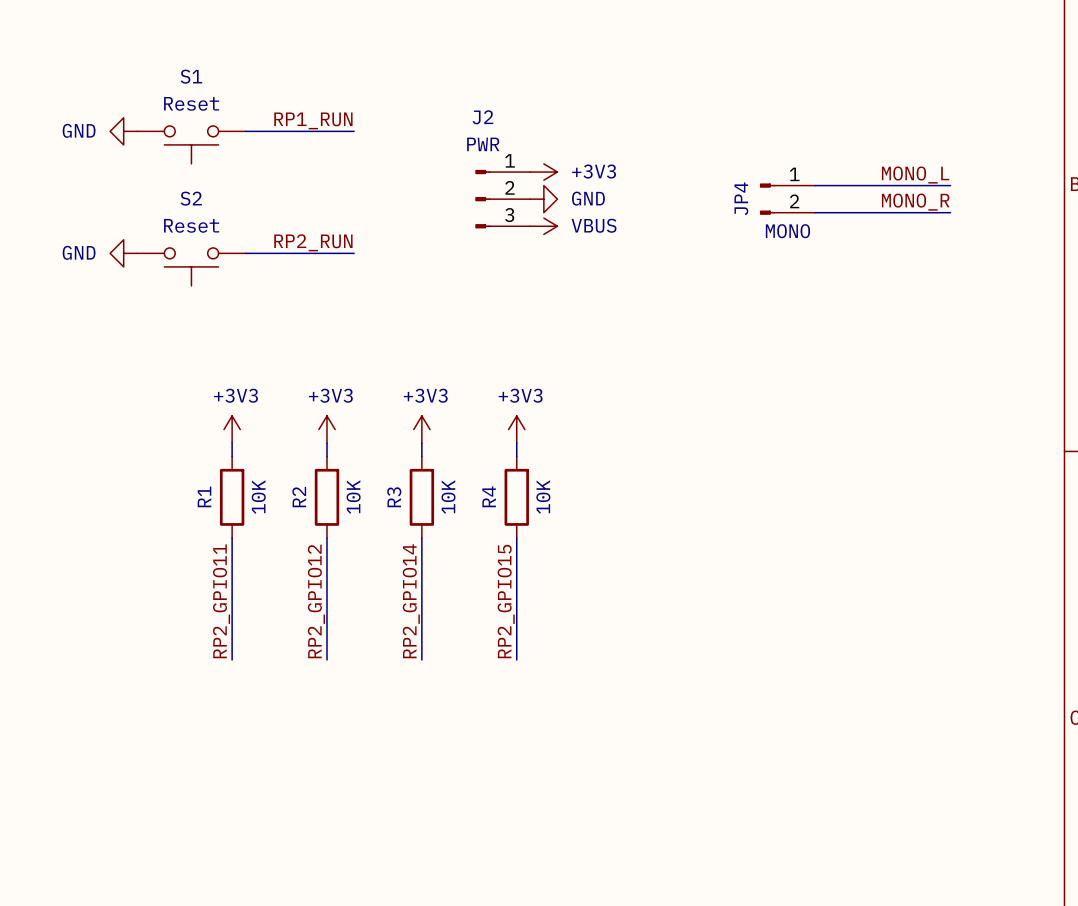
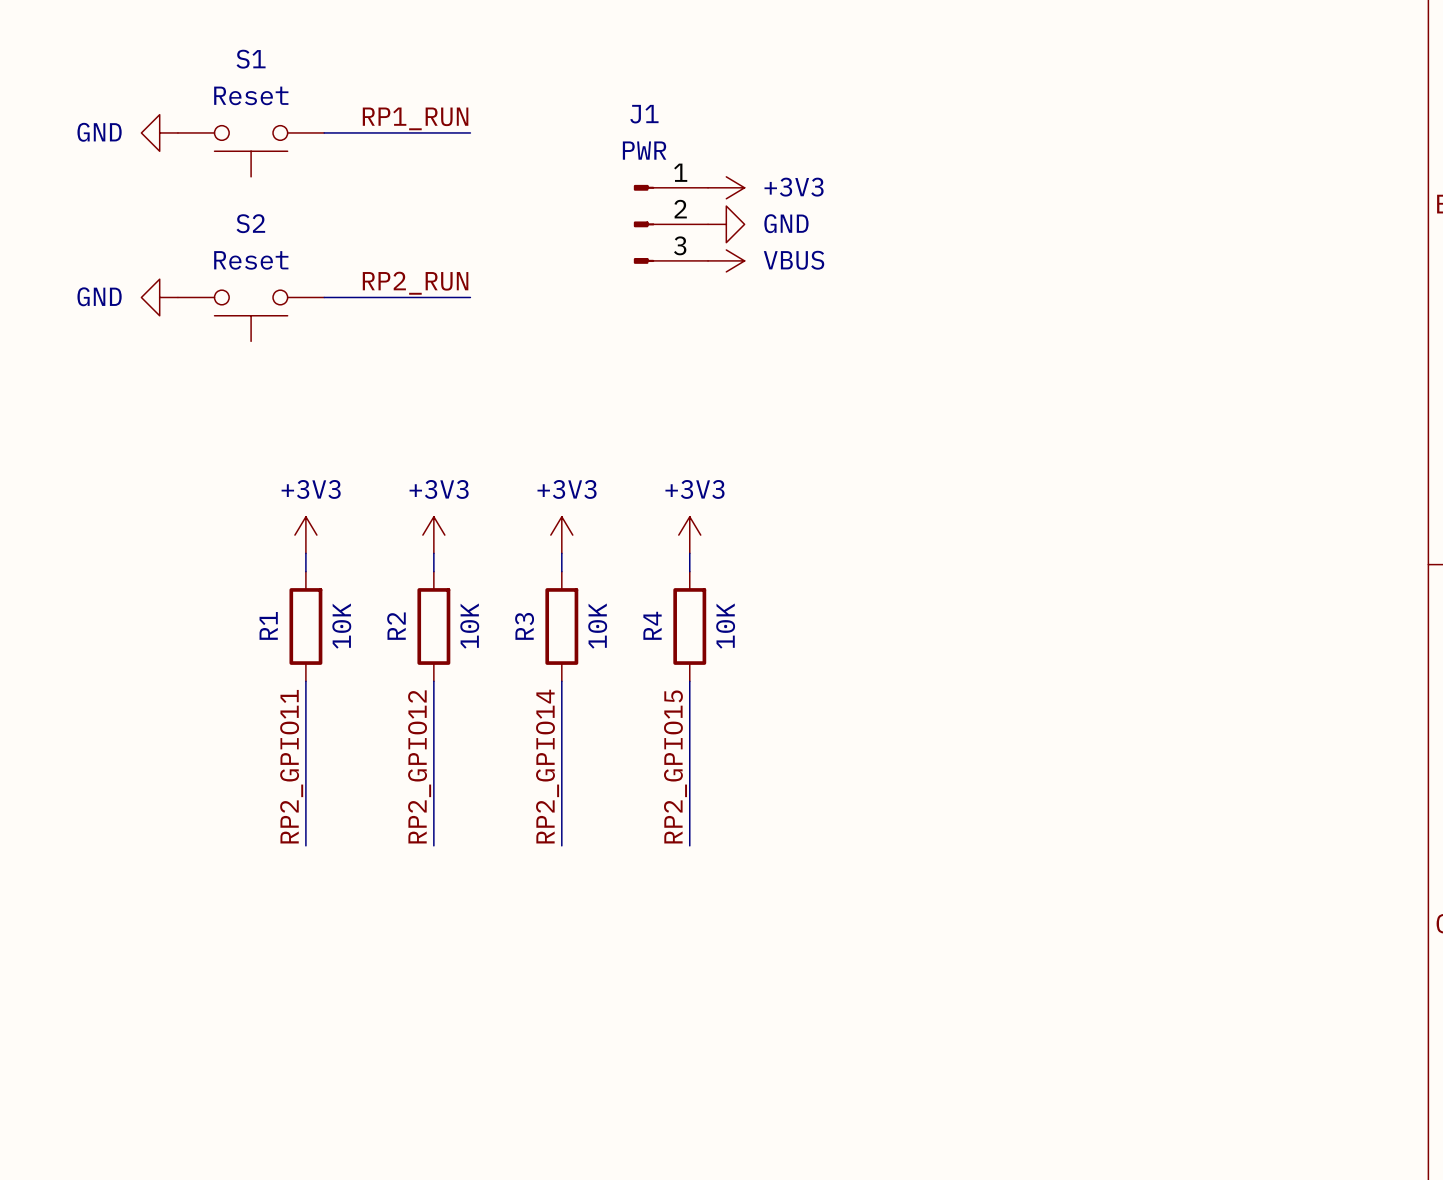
J2 name: J2 (482, 117) -> J1 (644, 114)
label: MONO_L (915, 175) -> none
wire: (814, 185) (950, 185) -> none
JP4: MONO (787, 199) -> none
label: MONO_R (915, 202) -> none
wire: (814, 212) (950, 212) -> none

